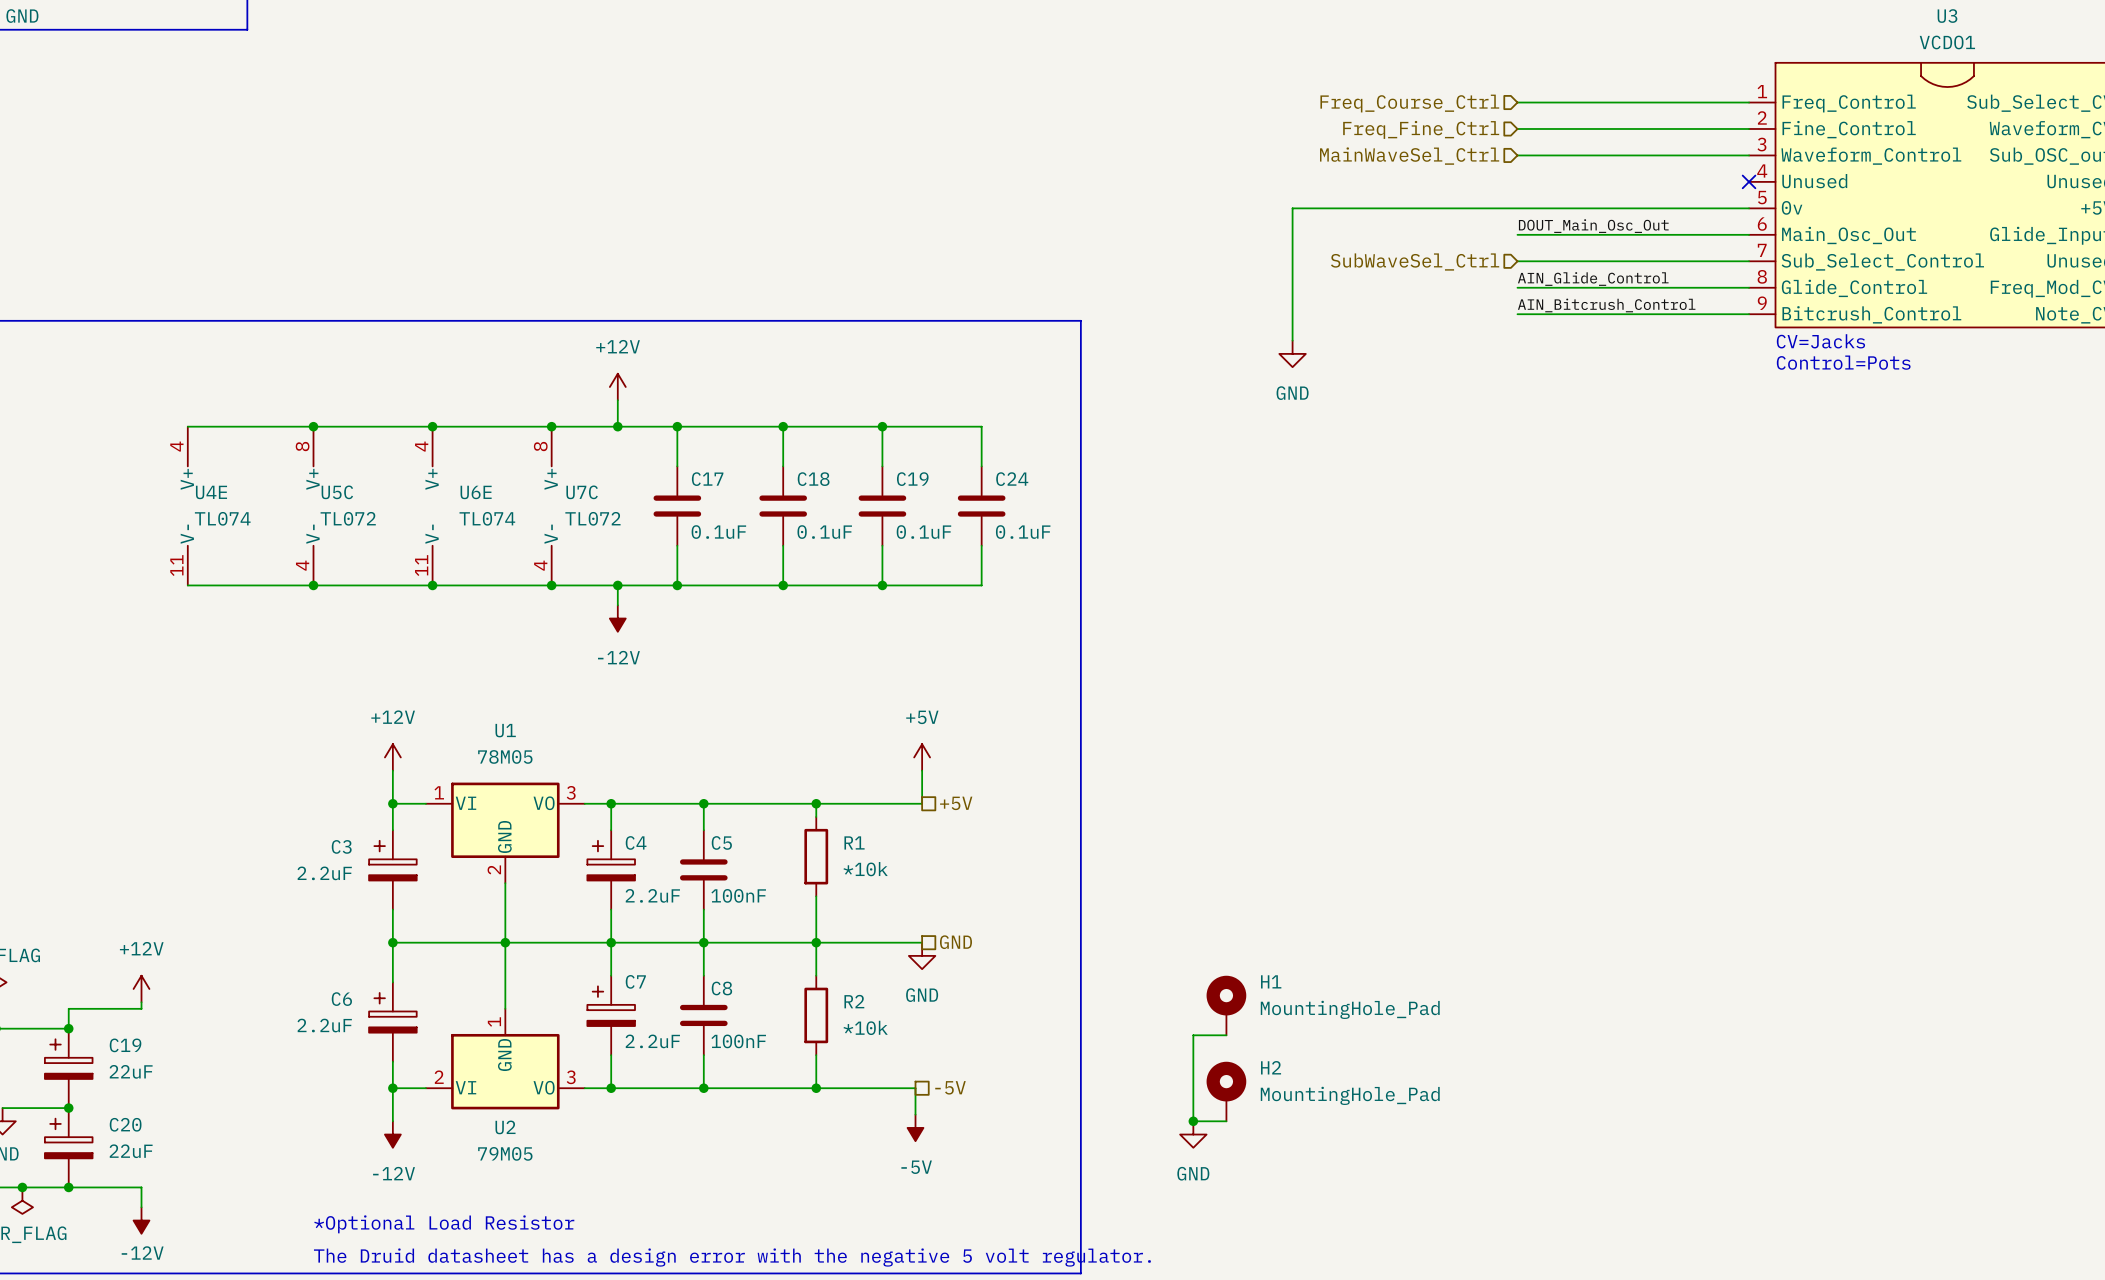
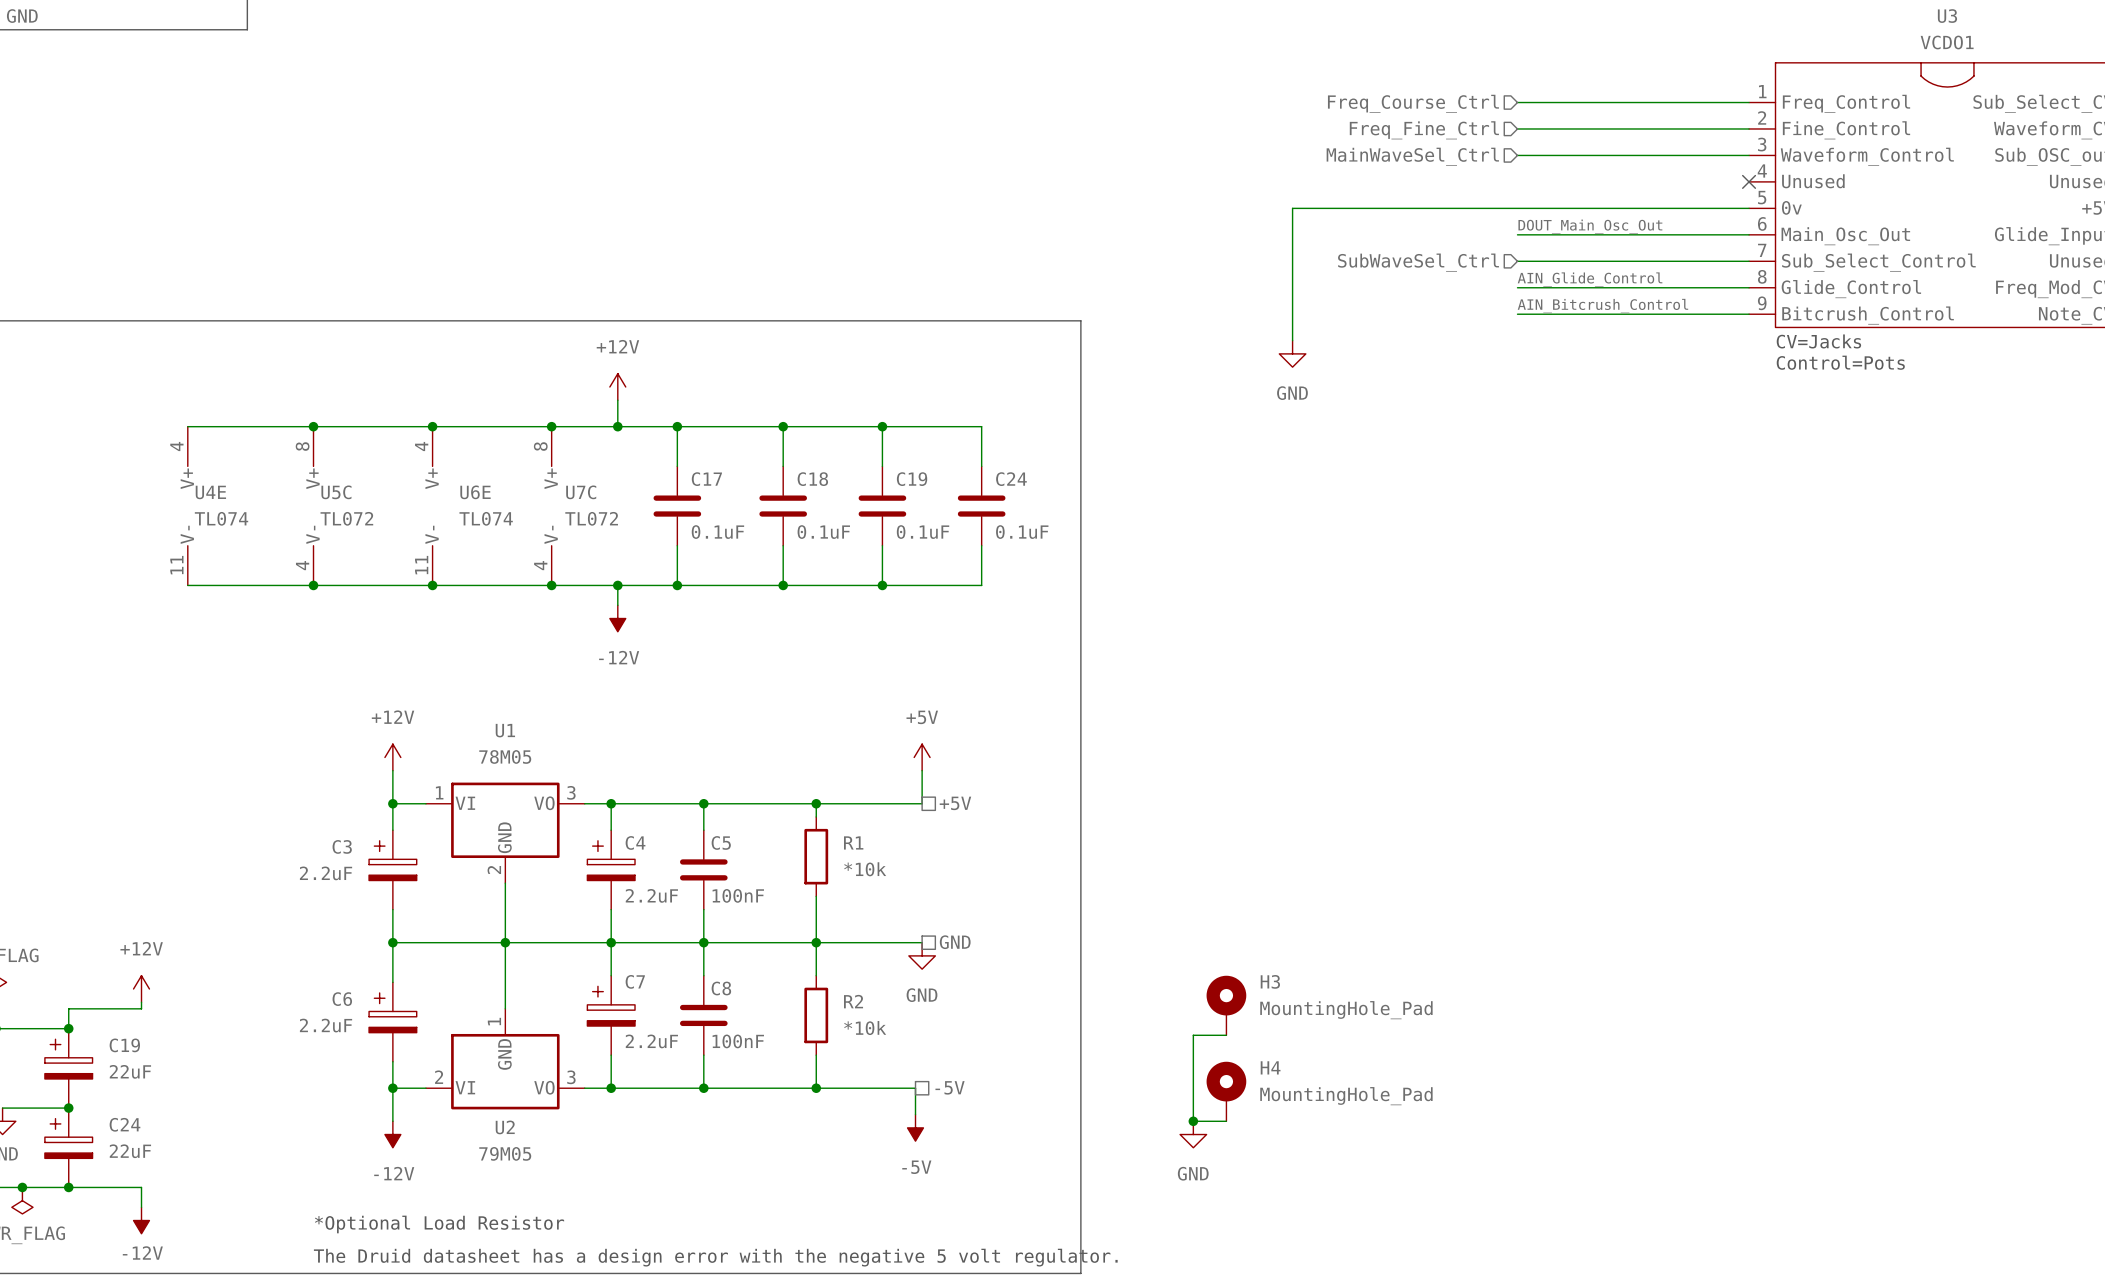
H1 name: H1 (1271, 981) -> H3 (1270, 981)
H2 name: H2 (1271, 1067) -> H4 (1270, 1067)
C20 name: C20 (125, 1124) -> C24 (124, 1124)

